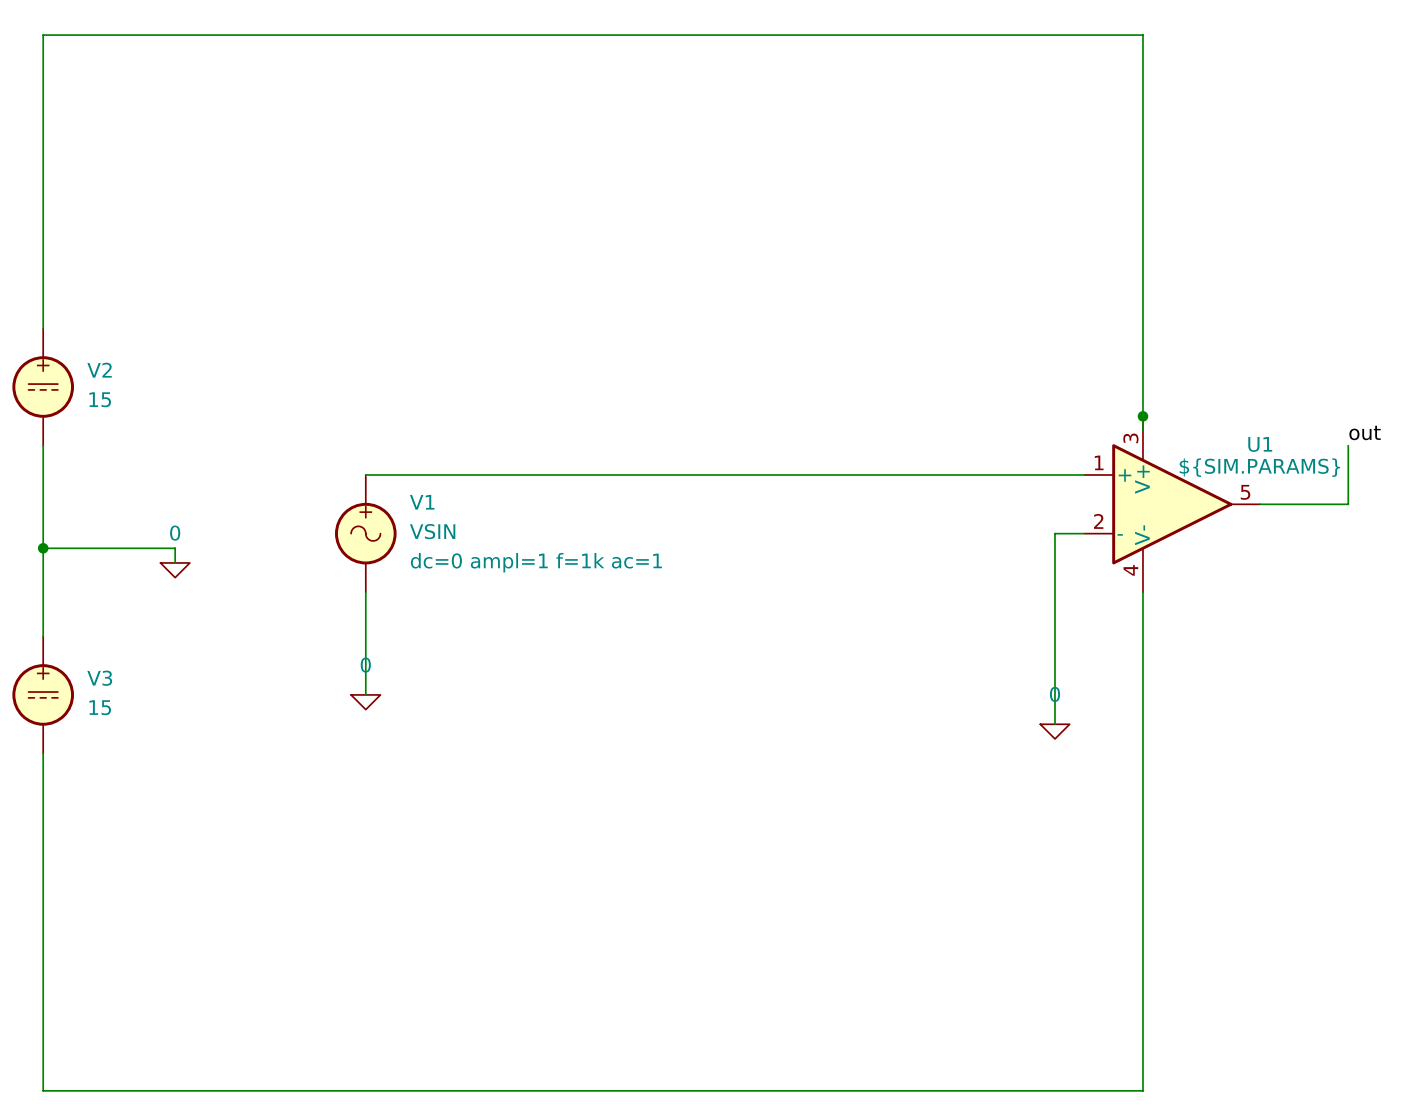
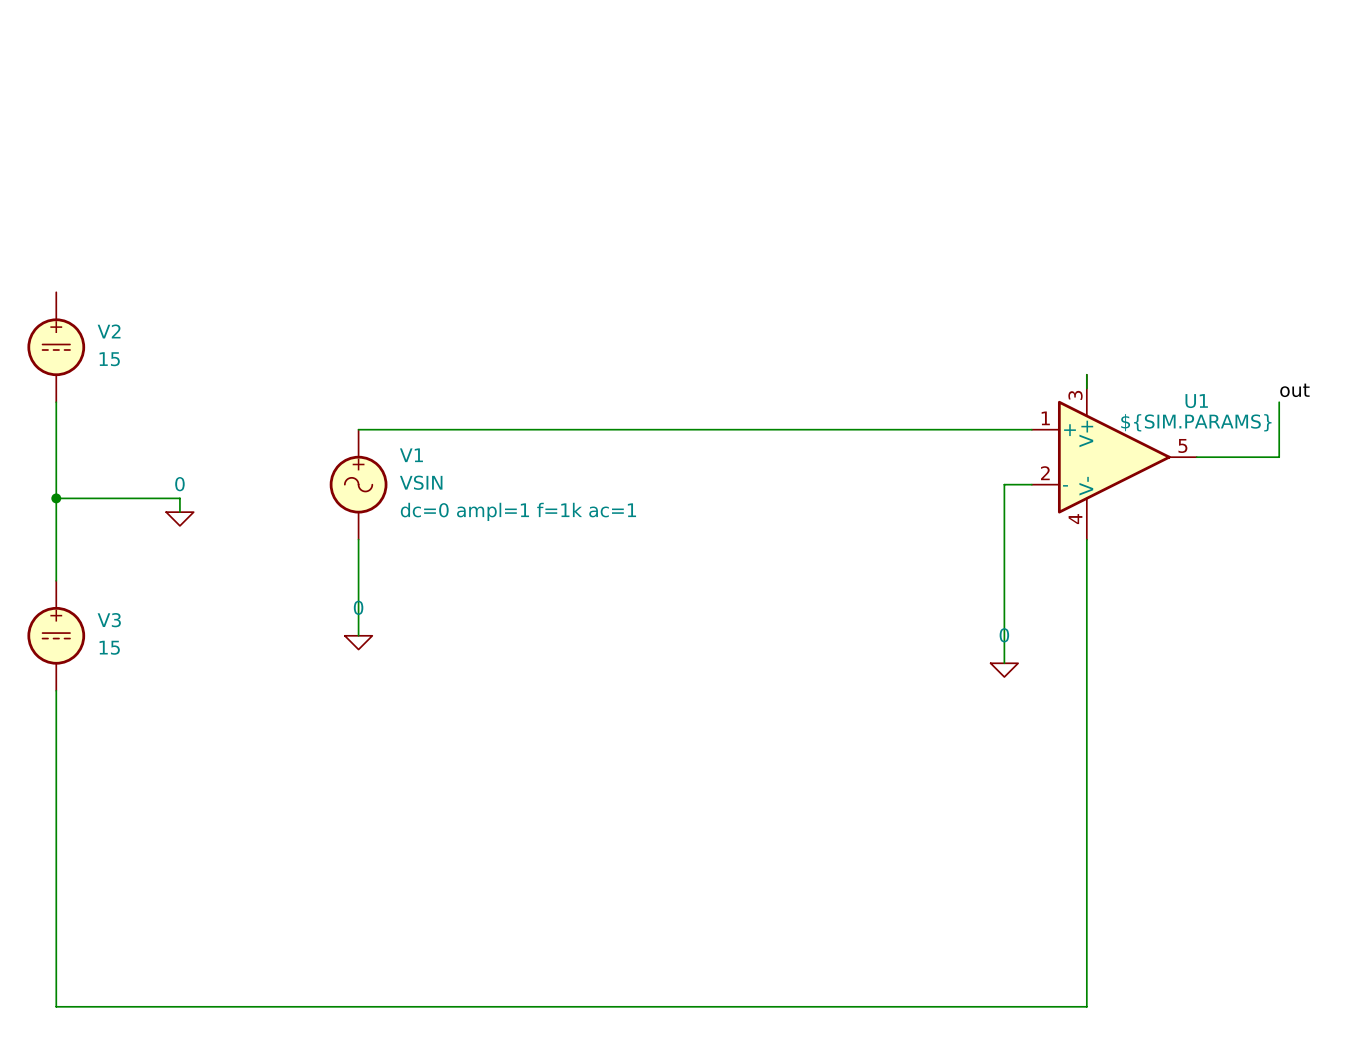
wire: (43, 328) (43, 35) (1142, 35) (1142, 416) -> none
junction: (1142, 416) -> none

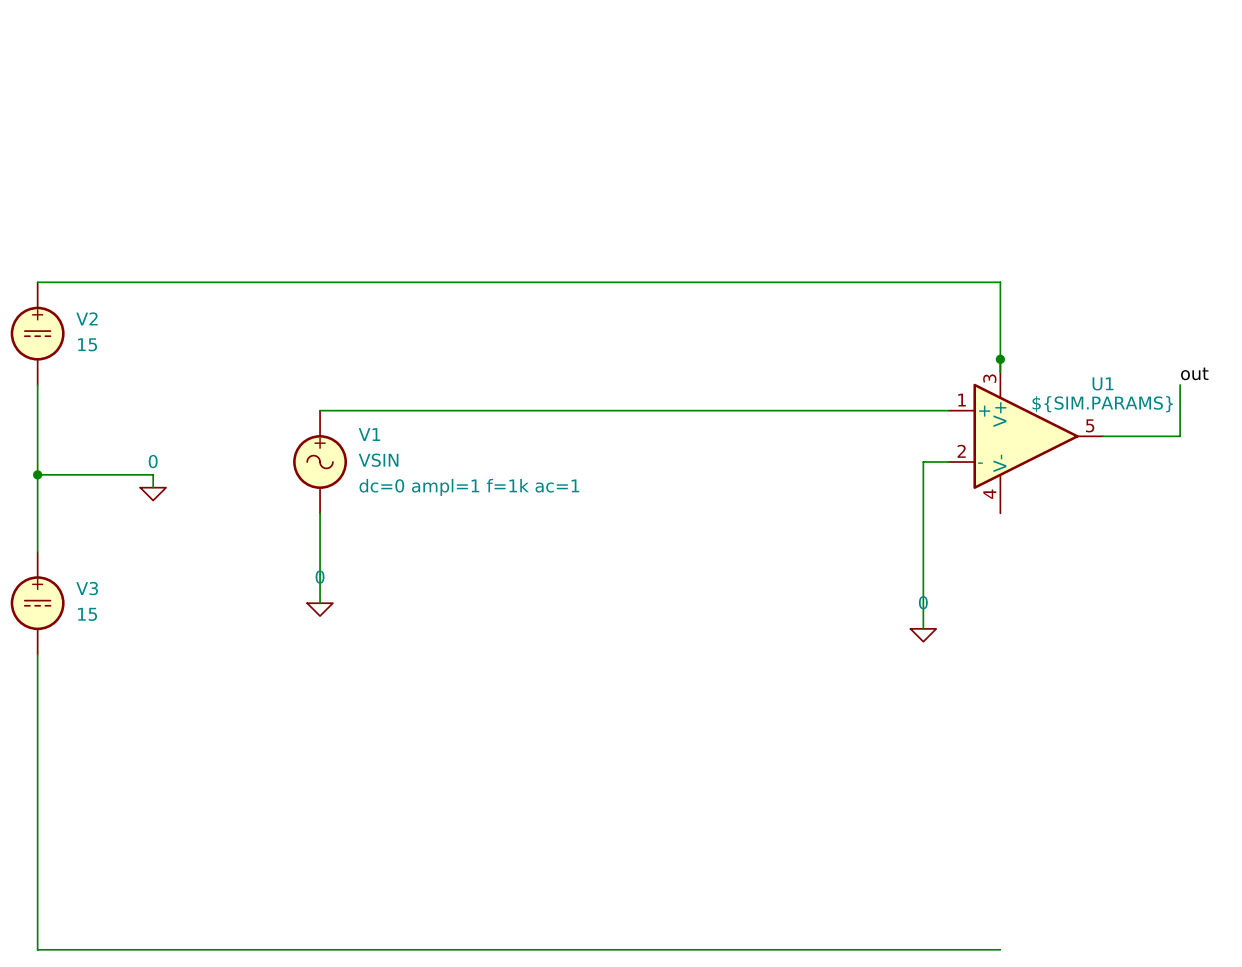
wire: none -> (37, 282) (1000, 282) (1000, 359)
junction: none -> (1000, 359)
wire: (1086, 539) (1086, 1006) -> none

